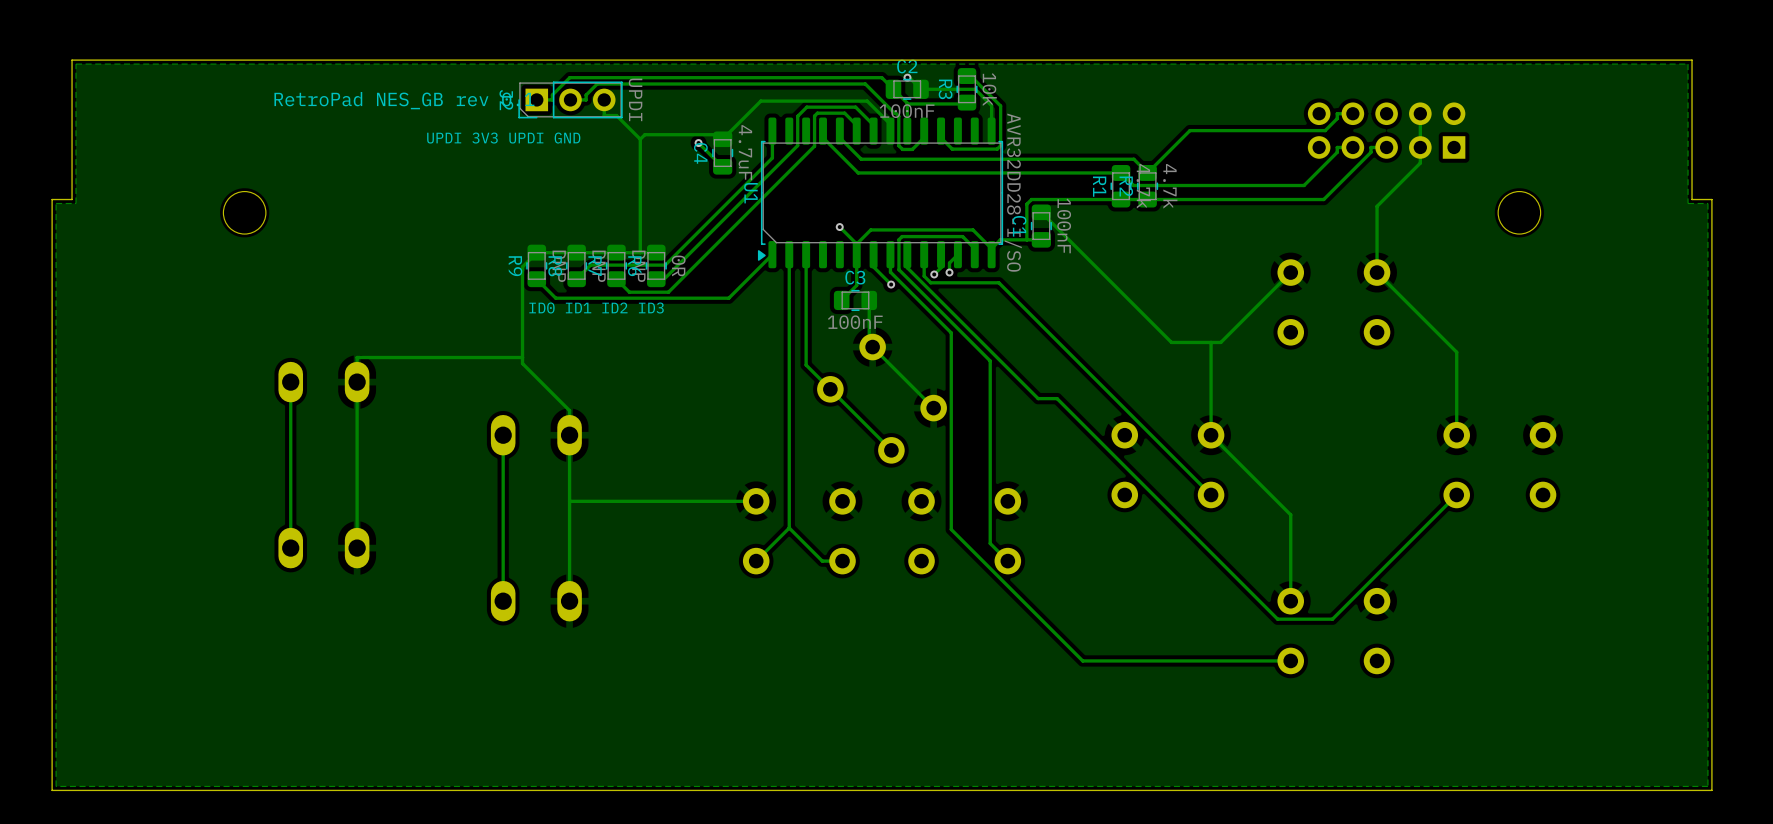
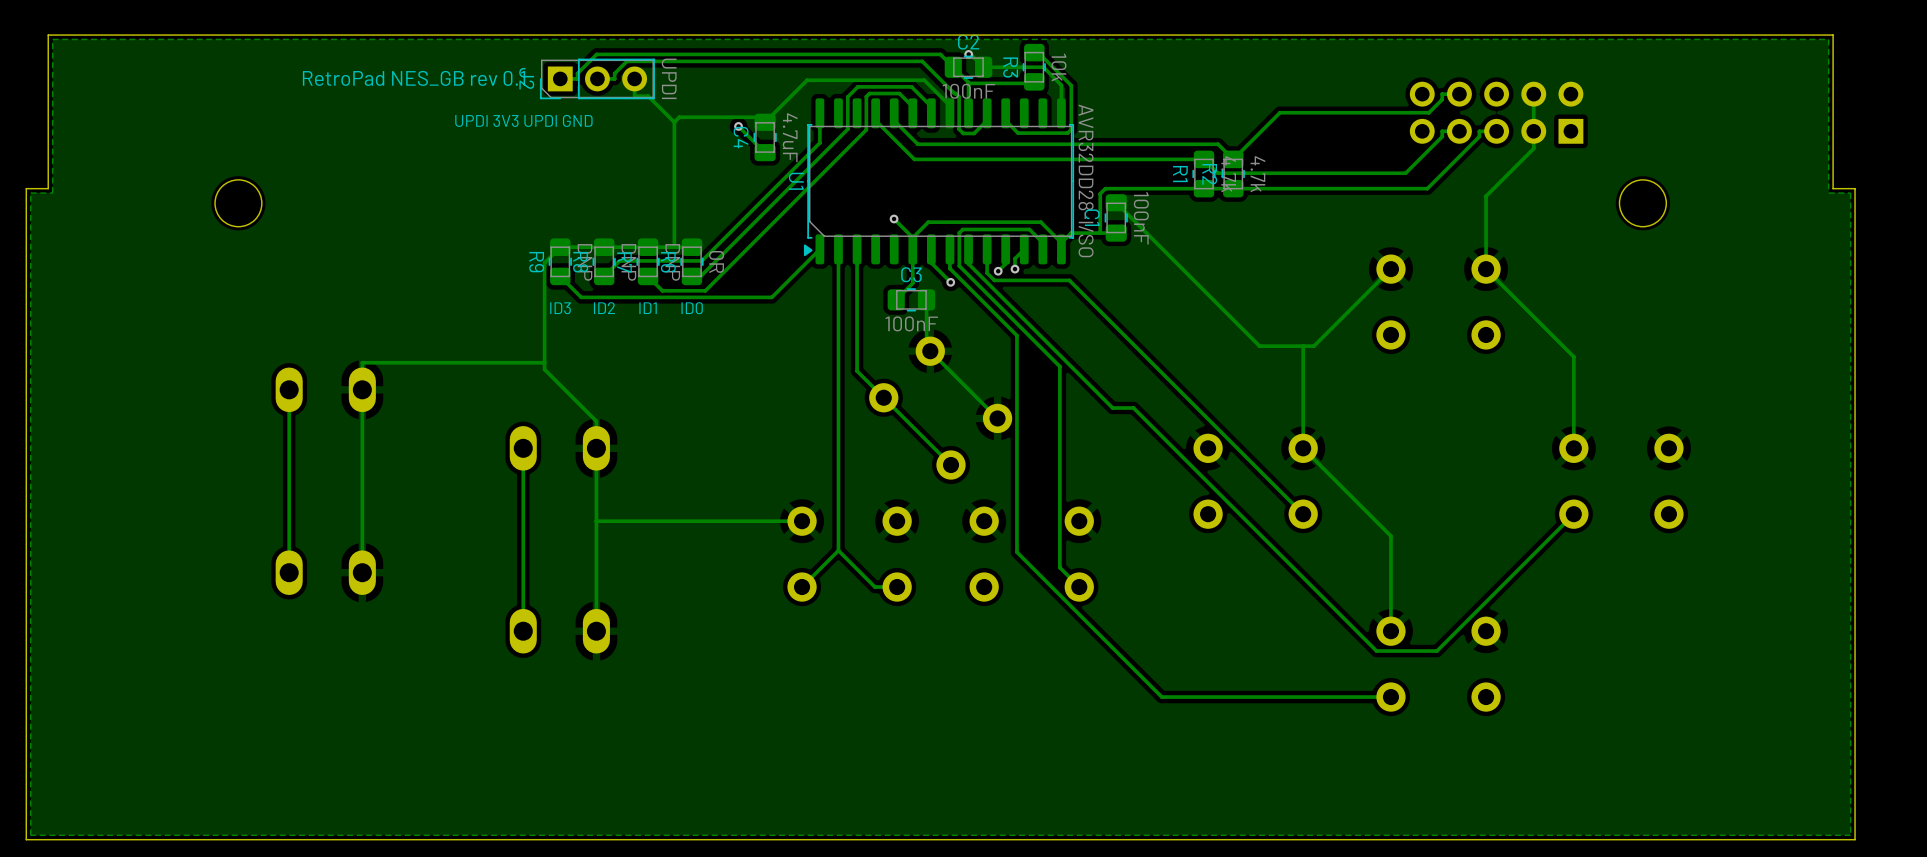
text: none -> ID2 (604, 308)
text: none -> ID3 (560, 308)
text: ID0 ID1 ID2 ID3 (596, 308) -> none
text: none -> ID1 (648, 308)
text: none -> ID0 (692, 308)

